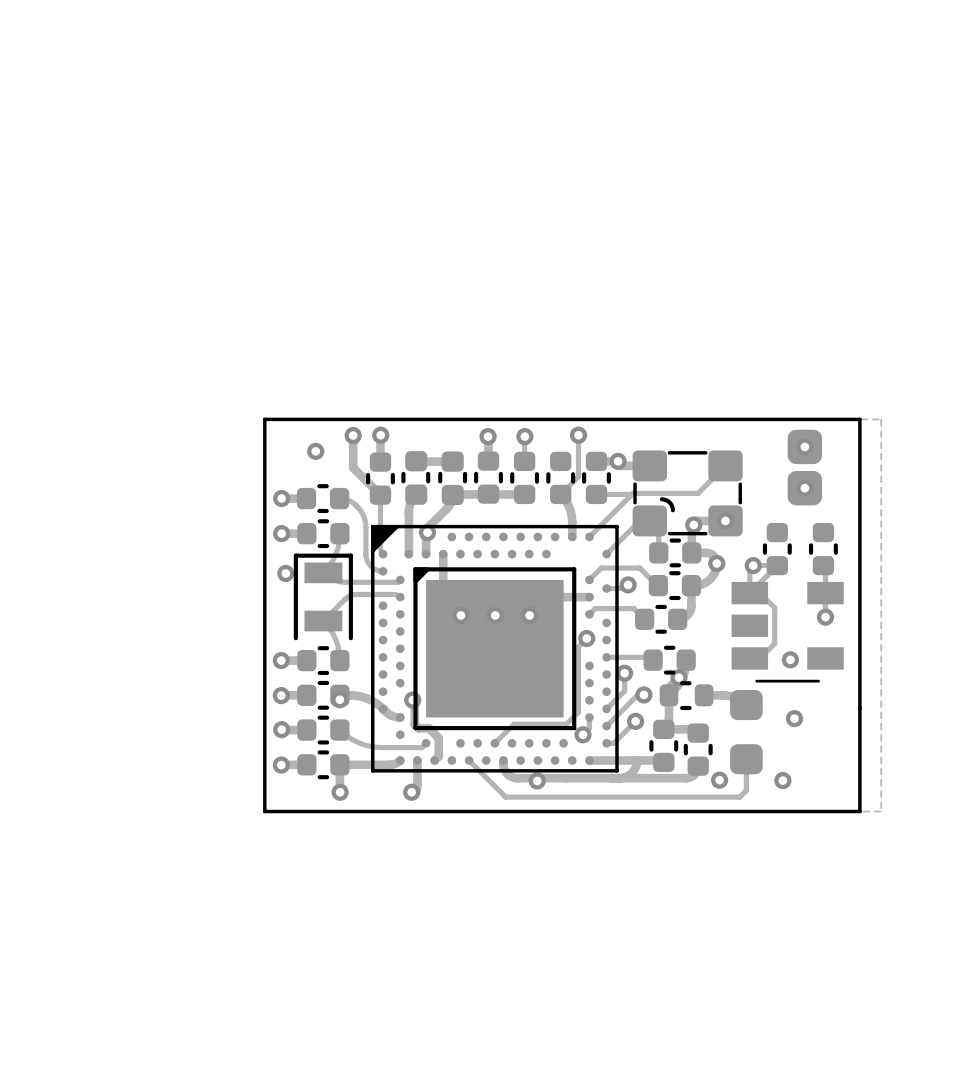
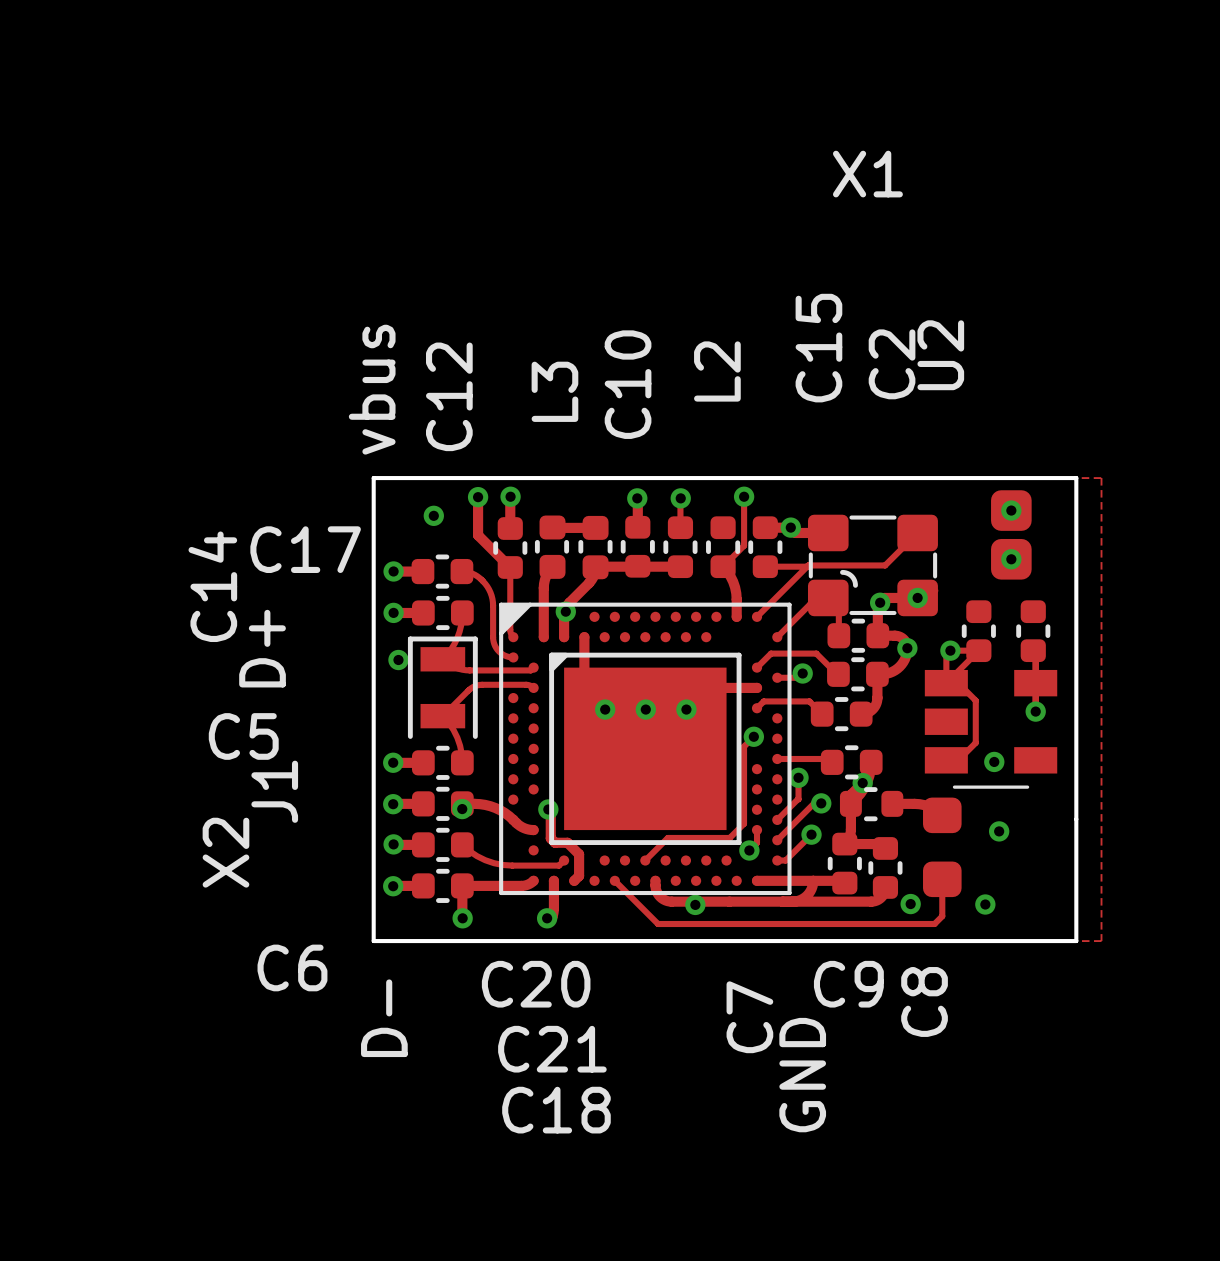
X1 name: none -> X1 (867, 174)
C15 name: none -> C15 (818, 348)
U2: none -> (940, 355)
C2 name: none -> C2 (892, 364)
L2 name: none -> L2 (717, 371)
C10 name: none -> C10 (628, 384)
L3 name: none -> L3 (554, 391)
C12 name: none -> C12 (449, 396)
C17 name: none -> C17 (305, 549)
C14 name: none -> C14 (212, 586)
J1: none -> (532, 728)
C5 name: none -> C5 (243, 736)
X2 name: none -> X2 (225, 852)
C6 name: none -> C6 (292, 967)
C20 name: none -> C20 (536, 984)
C9 name: none -> C9 (848, 984)
C8 name: none -> C8 (924, 1001)
C7 name: none -> C7 (749, 1017)
C21 name: none -> C21 (552, 1049)
C18 name: none -> C18 (556, 1110)

